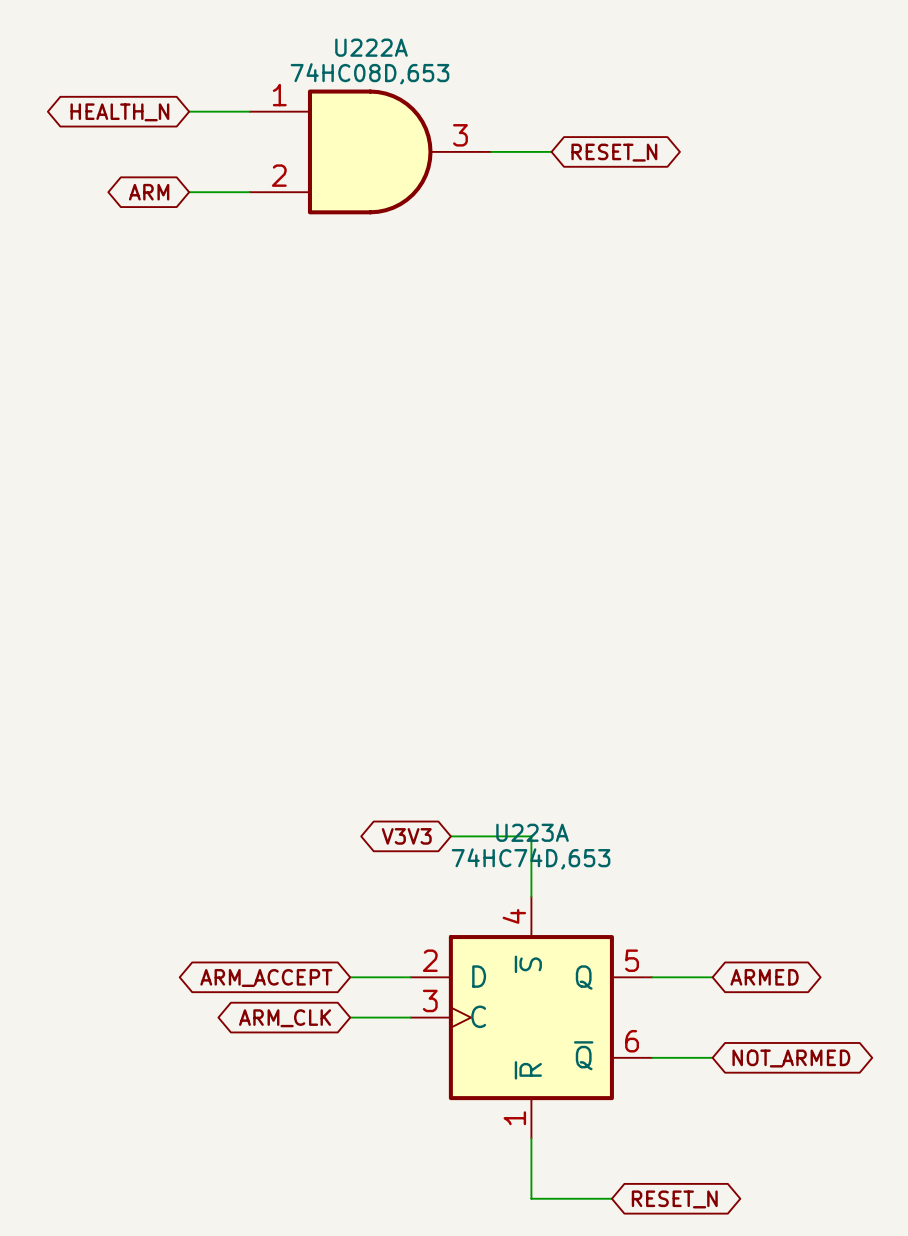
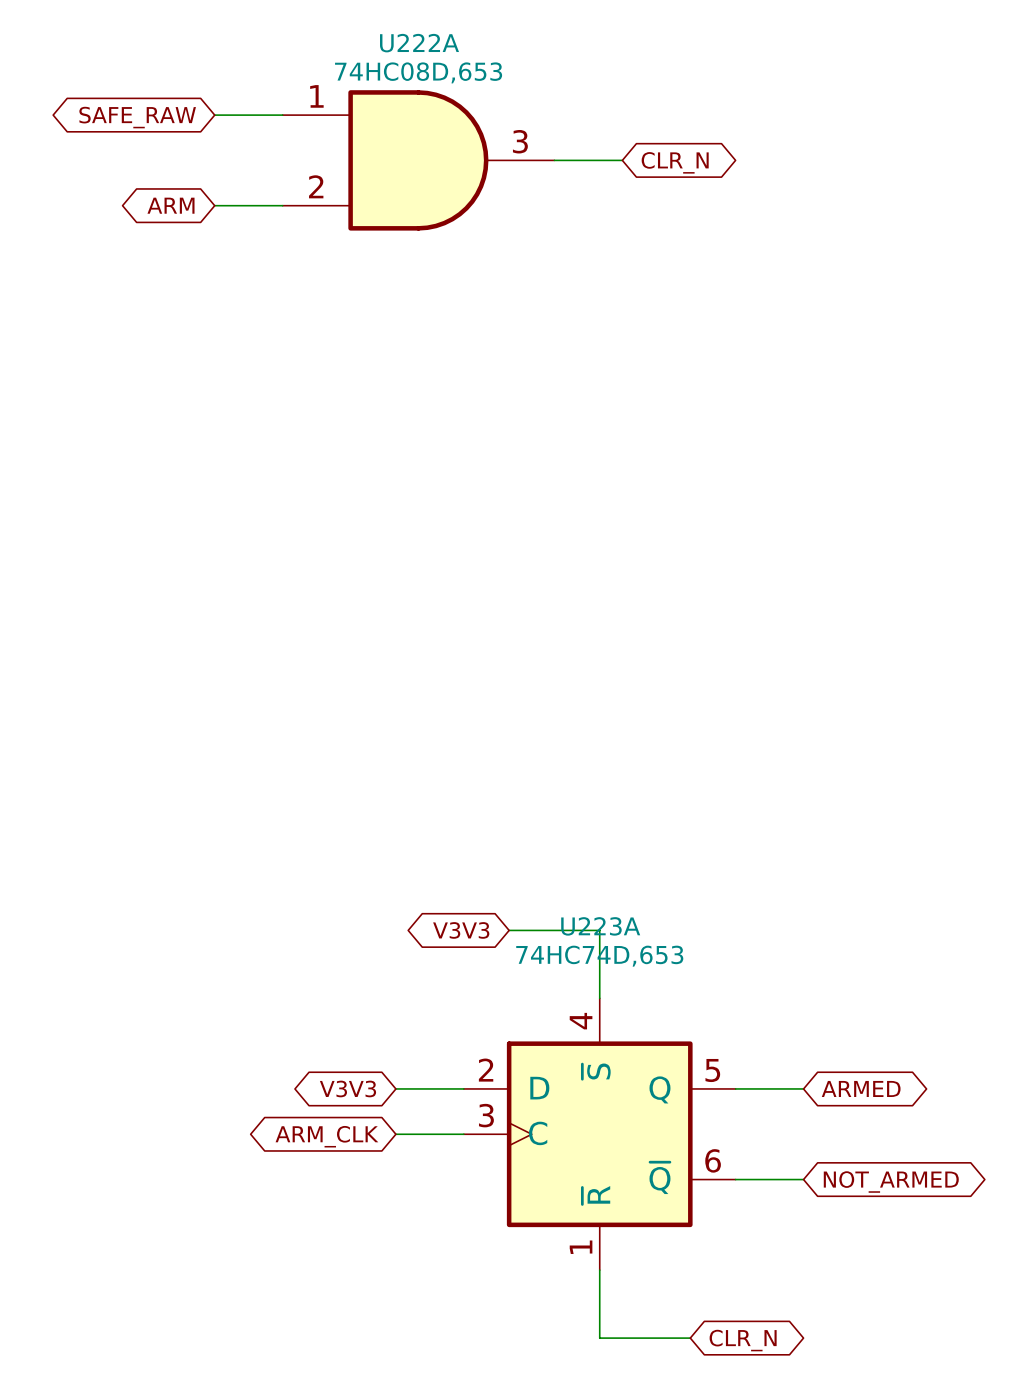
global label: HEALTH_N (119, 112) -> SAFE_RAW (137, 117)
global label: RESET_N (614, 152) -> CLR_N (675, 162)
global label: ARM_ACCEPT (266, 977) -> V3V3 (347, 1088)
global label: RESET_N (674, 1199) -> CLR_N (743, 1340)

